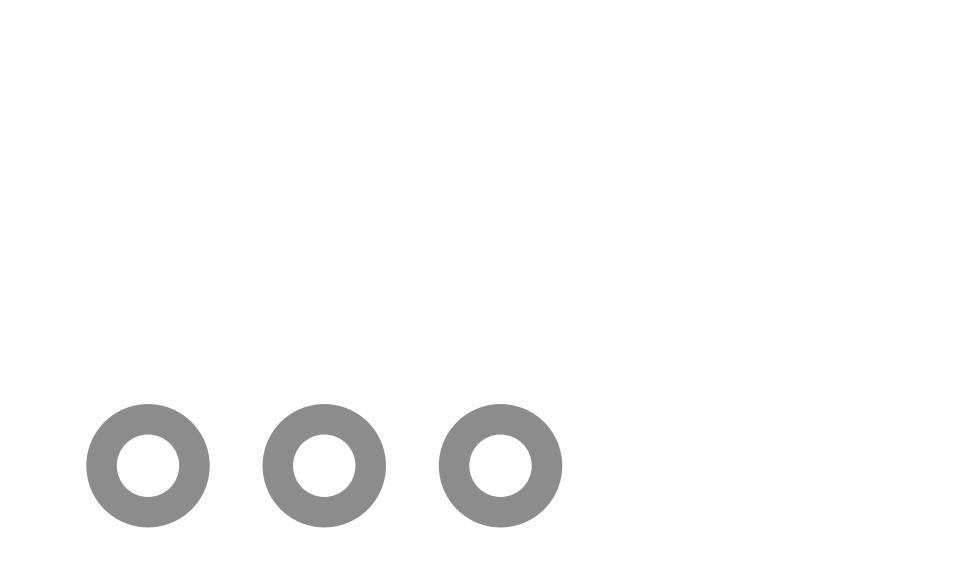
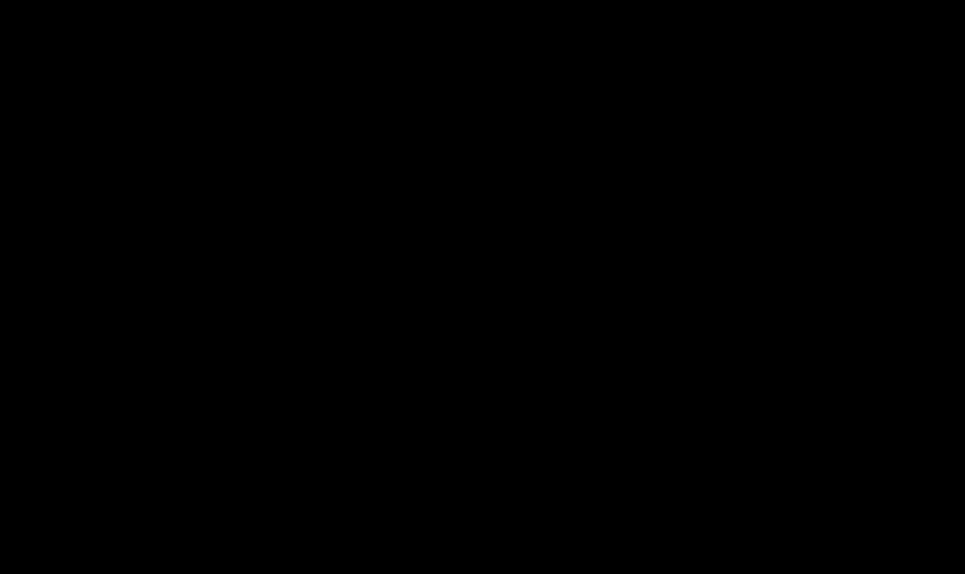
part: (324, 465) -> none

